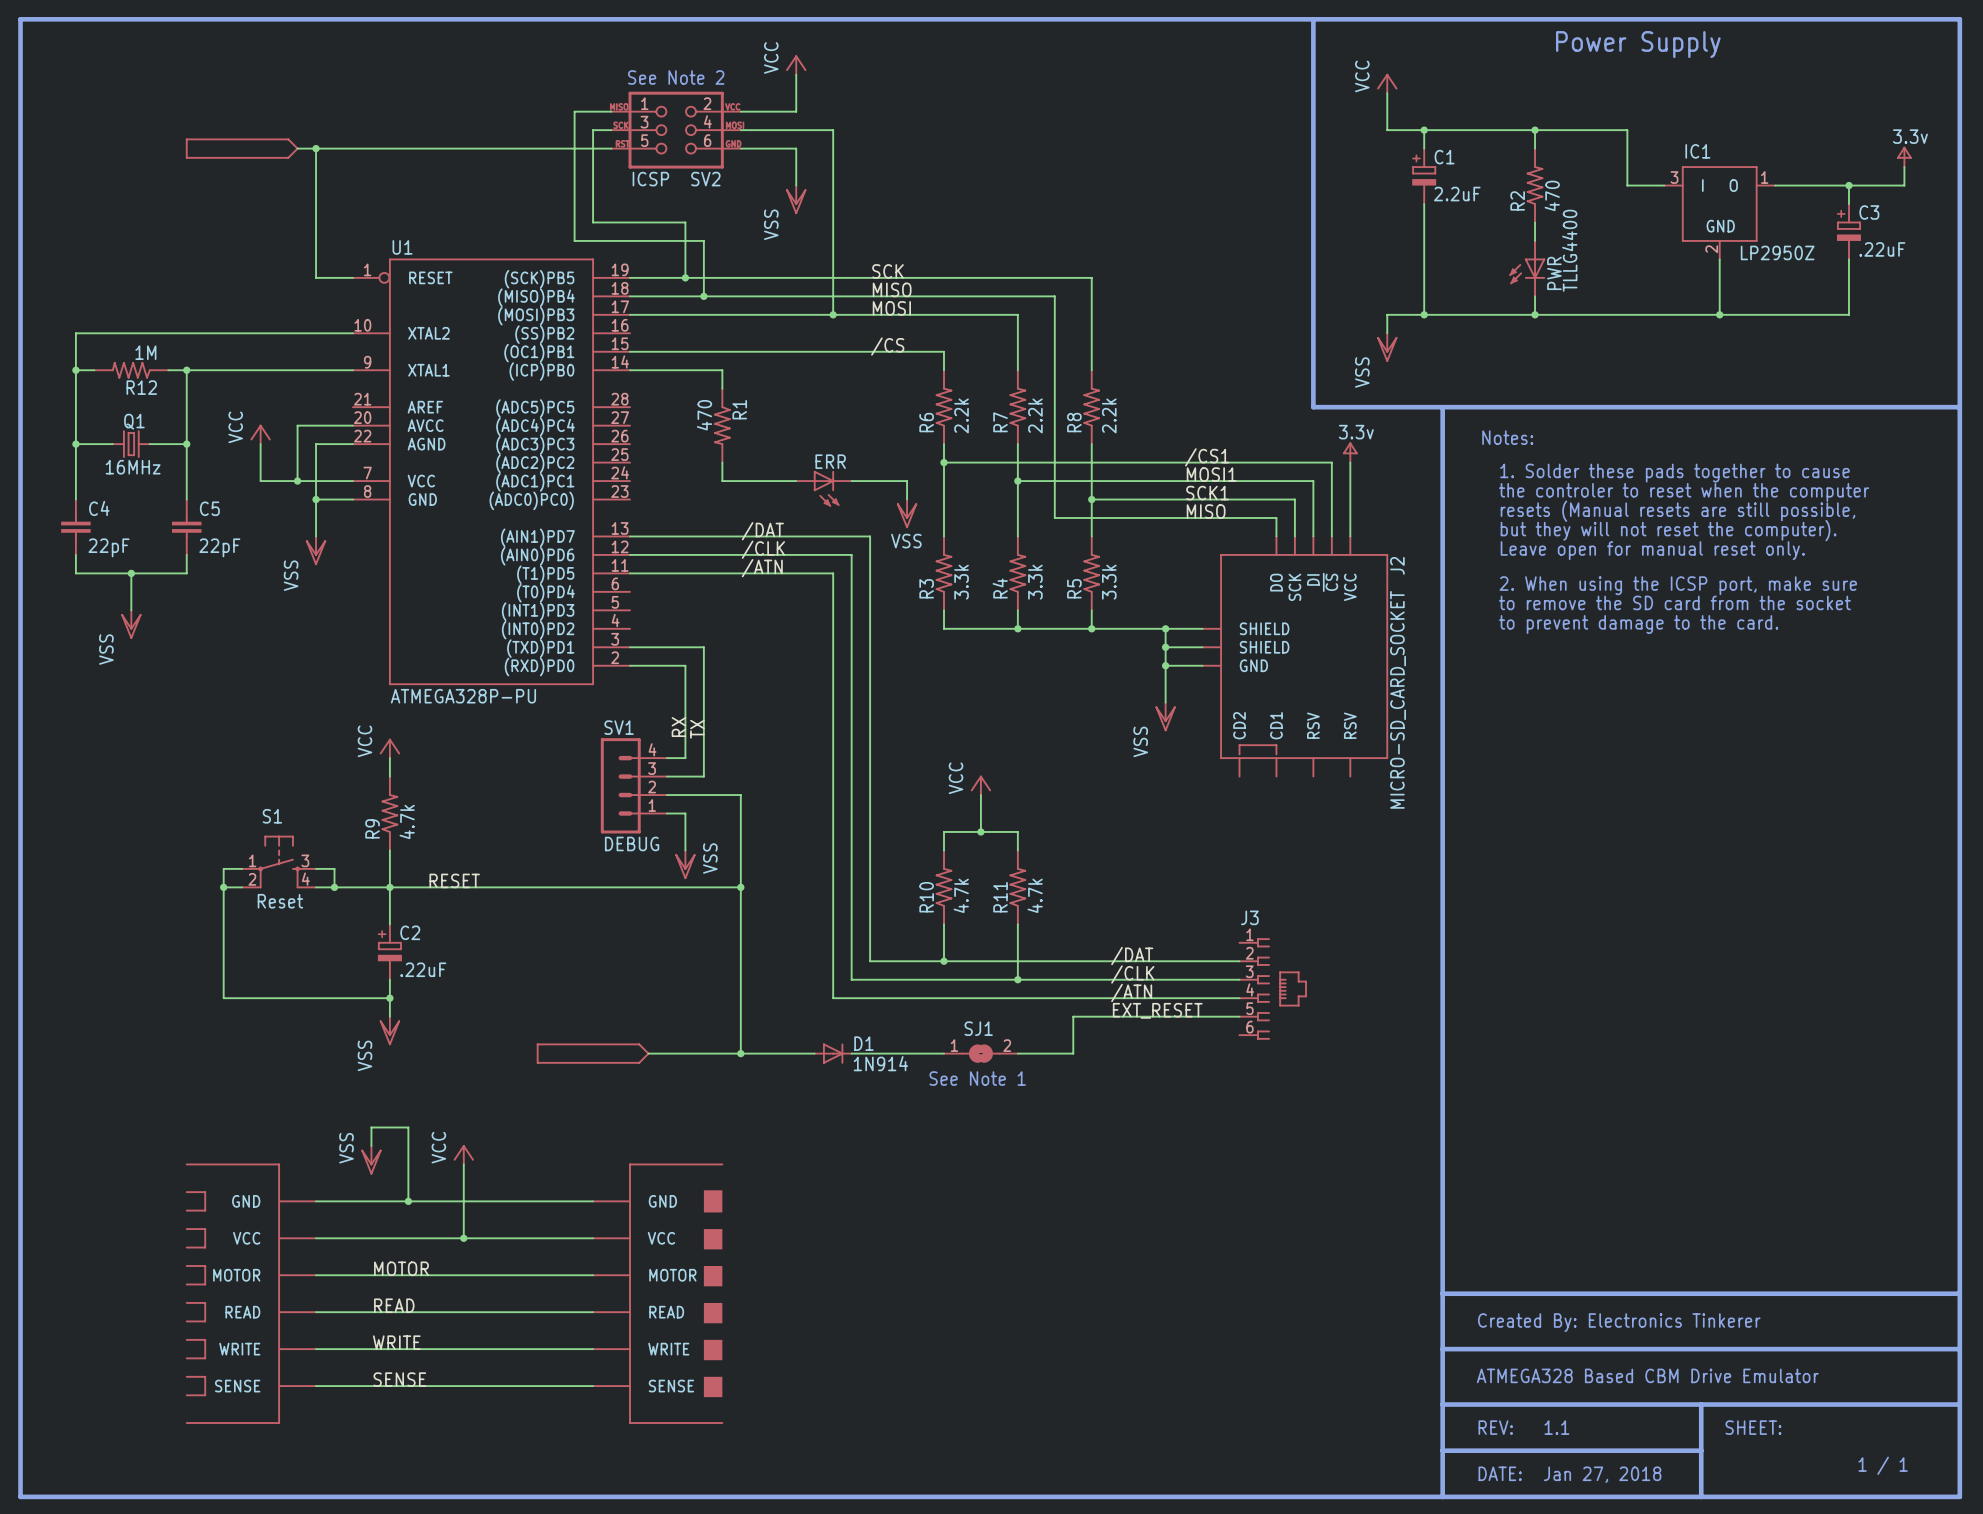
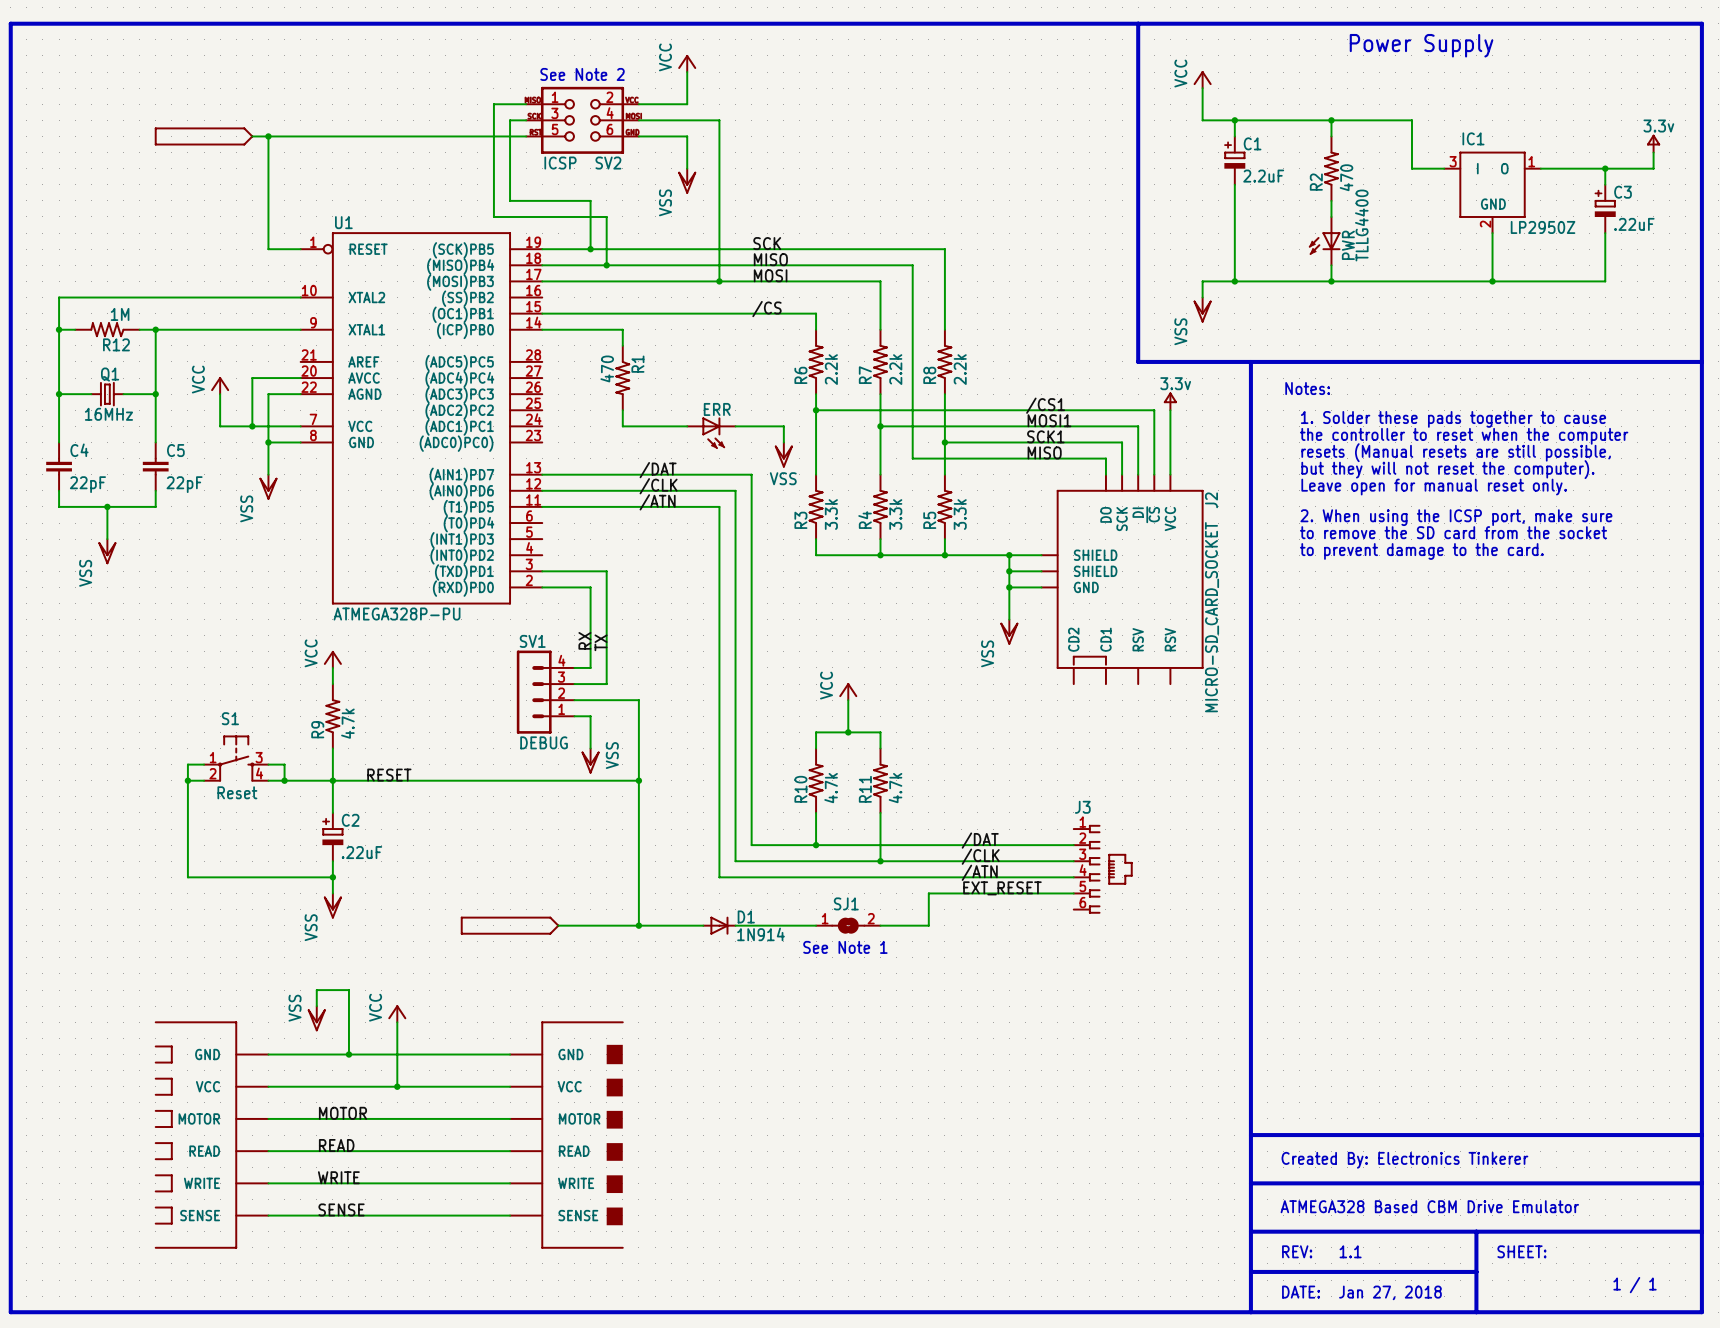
text: the controler to reset when the computer (1684, 492) -> the controller to reset when the computer (1464, 436)

